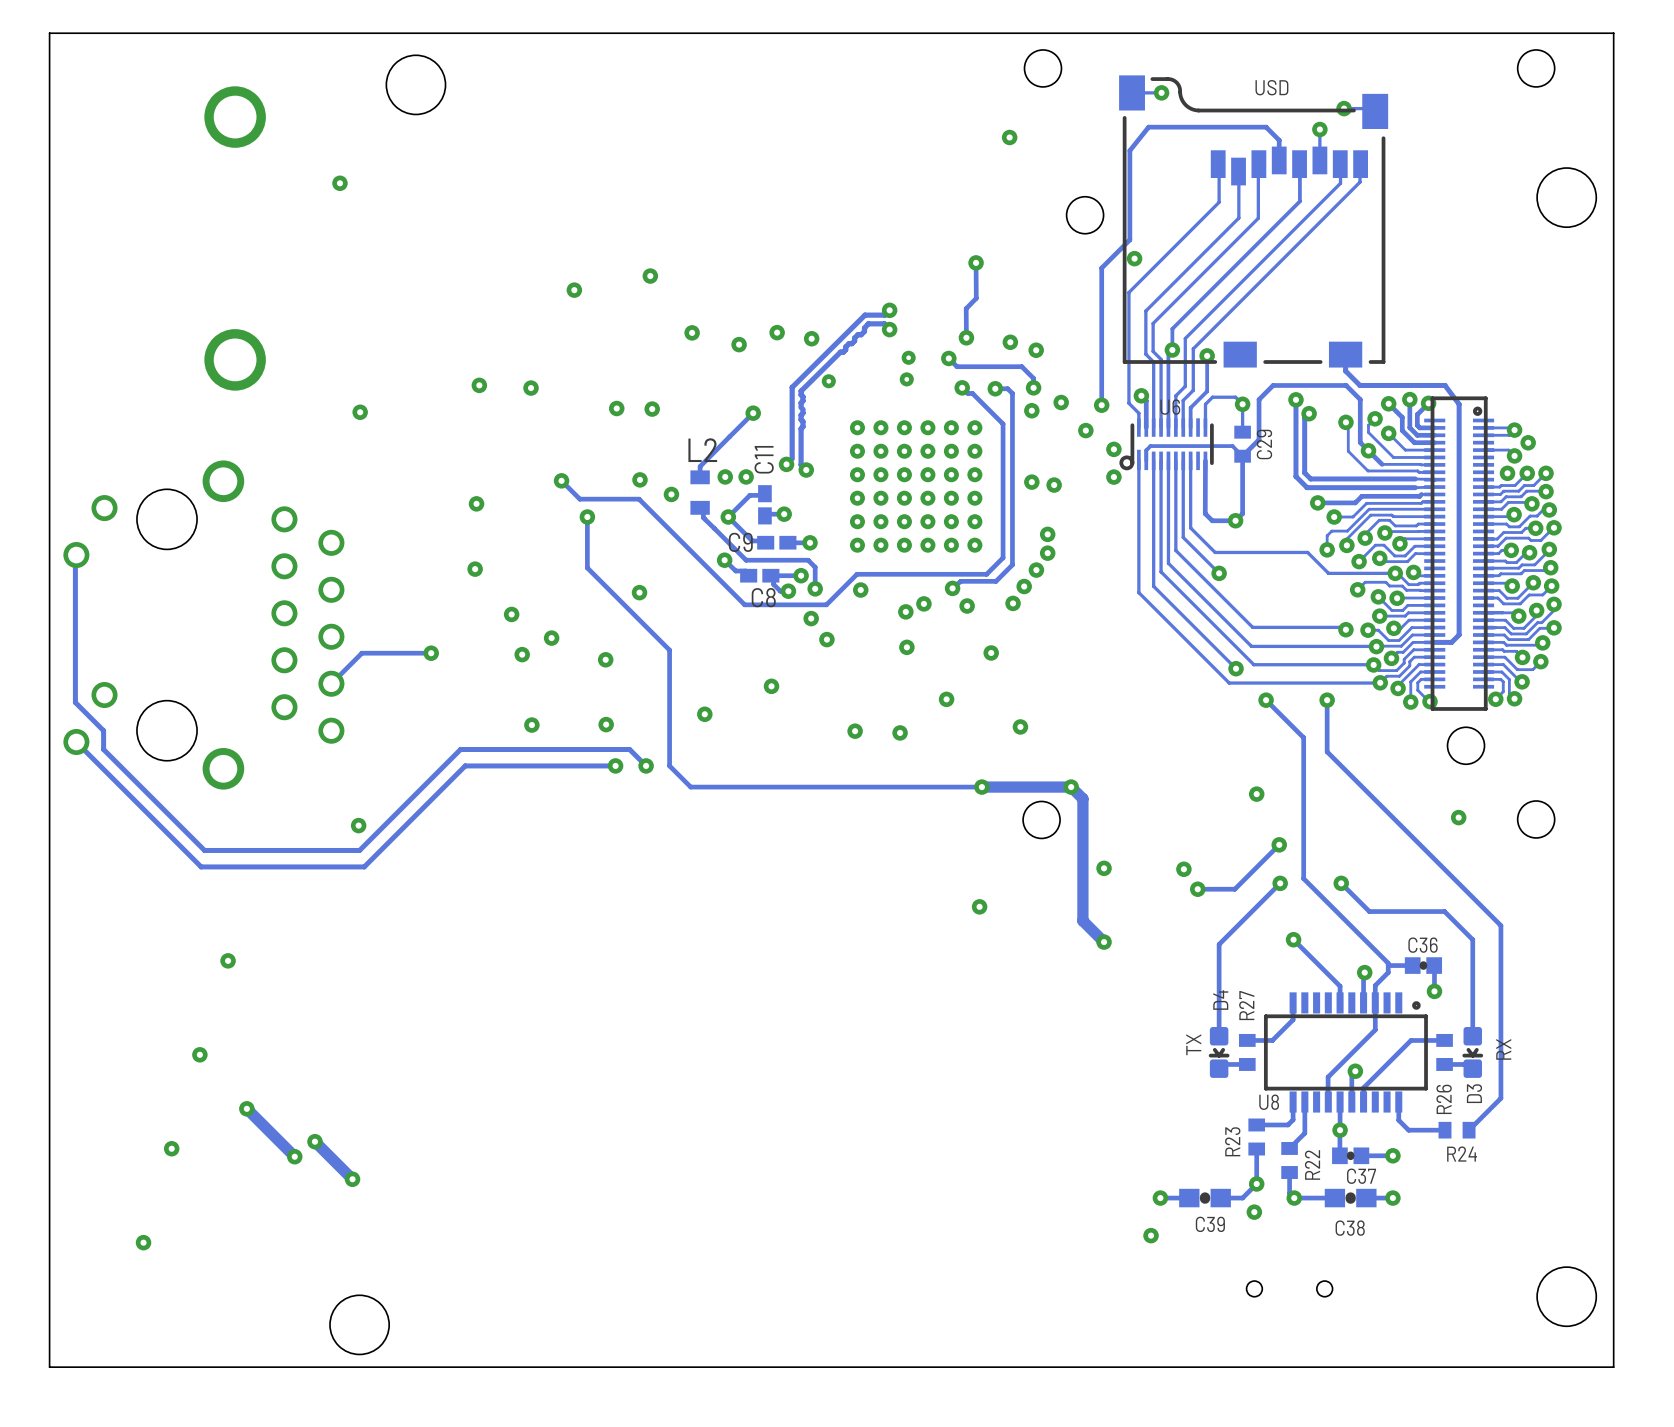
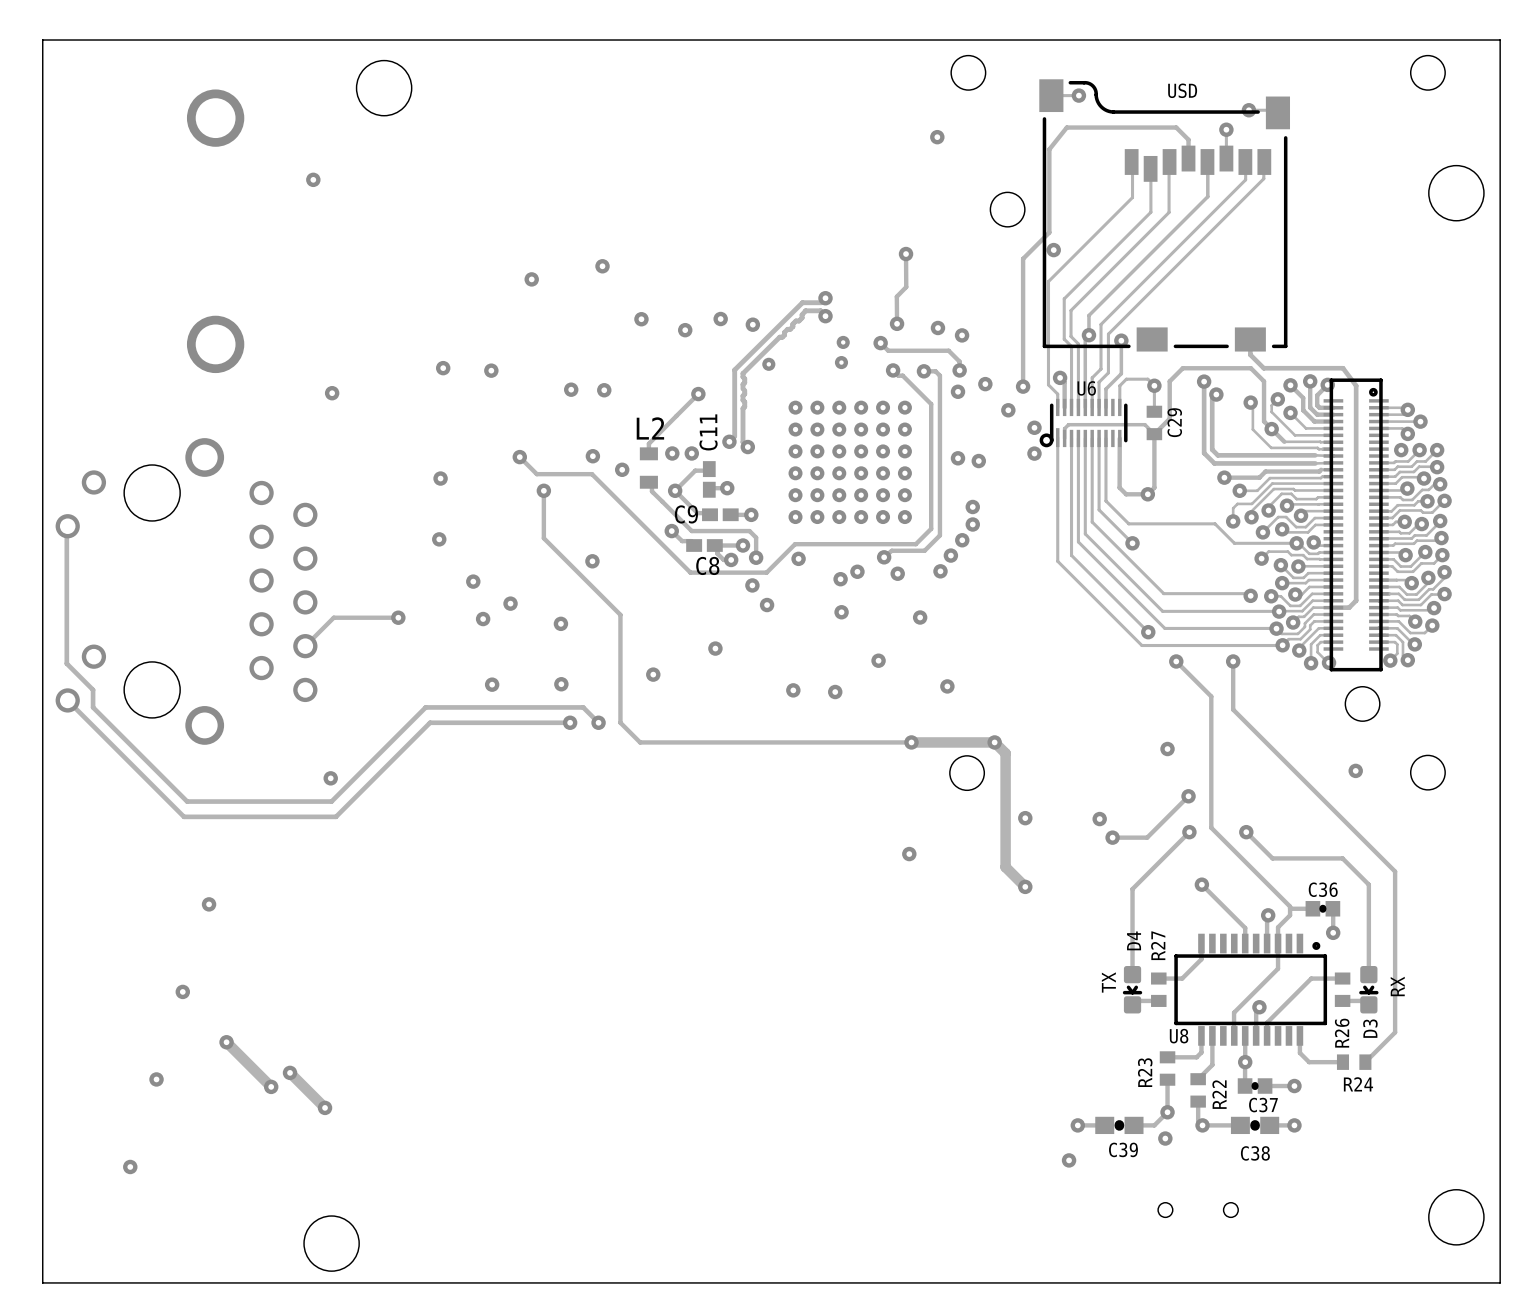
track: none -> (1420, 421) (1378, 421)

